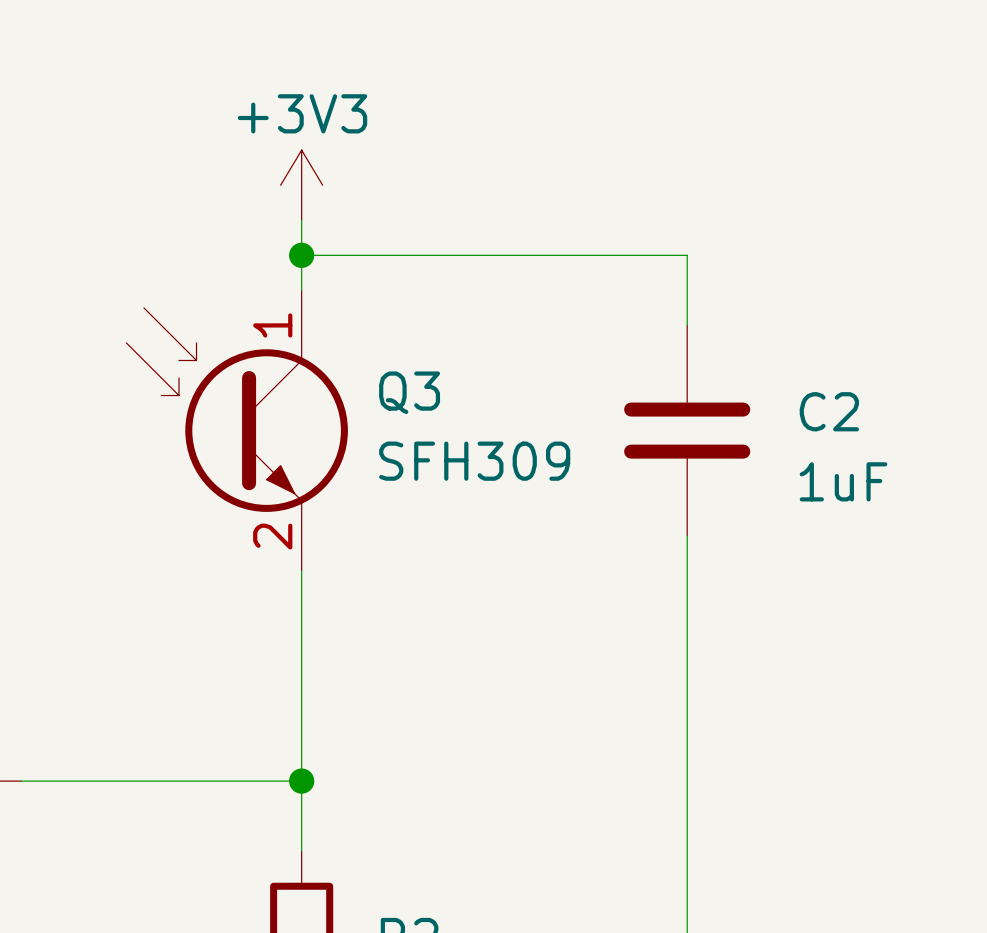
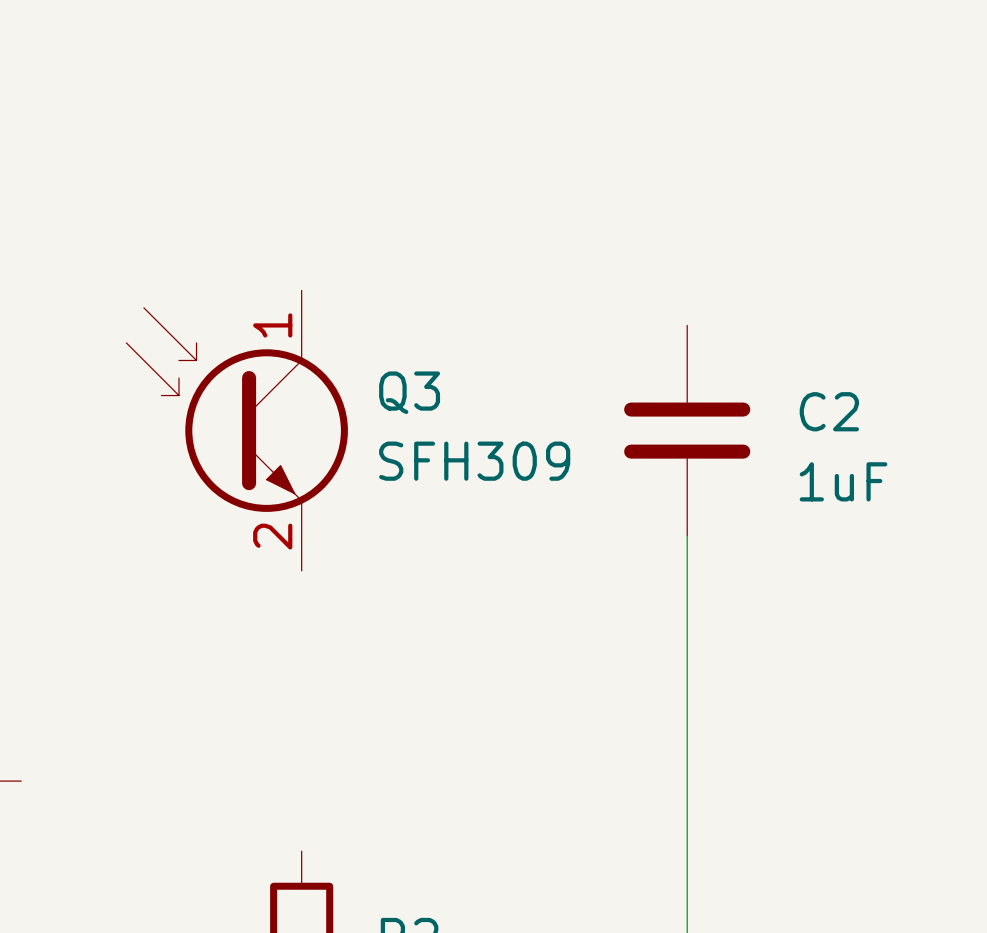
power symbol: +3V3 (301, 185) -> none
wire: (301, 220) (301, 290) -> none
wire: (301, 255) (687, 255) (687, 325) -> none
junction: (301, 255) -> none
wire: (301, 570) (301, 851) -> none
wire: (21, 781) (301, 781) -> none
junction: (301, 781) -> none

